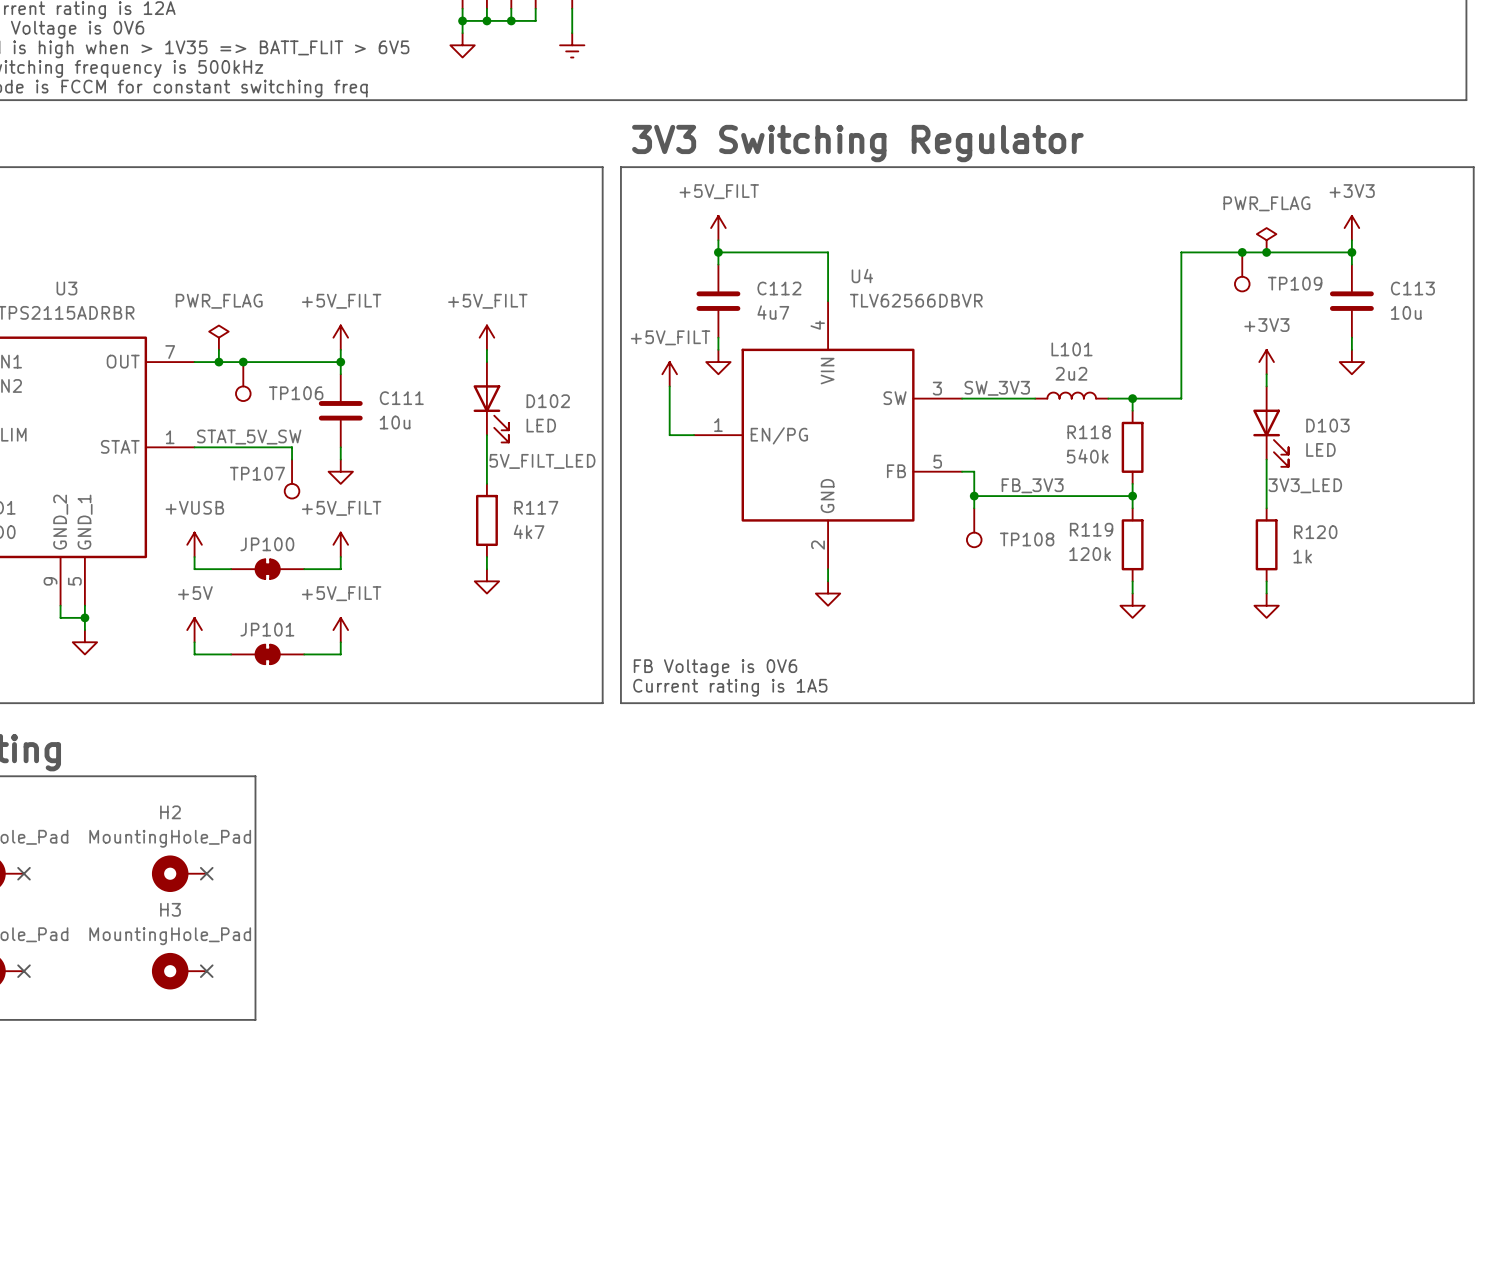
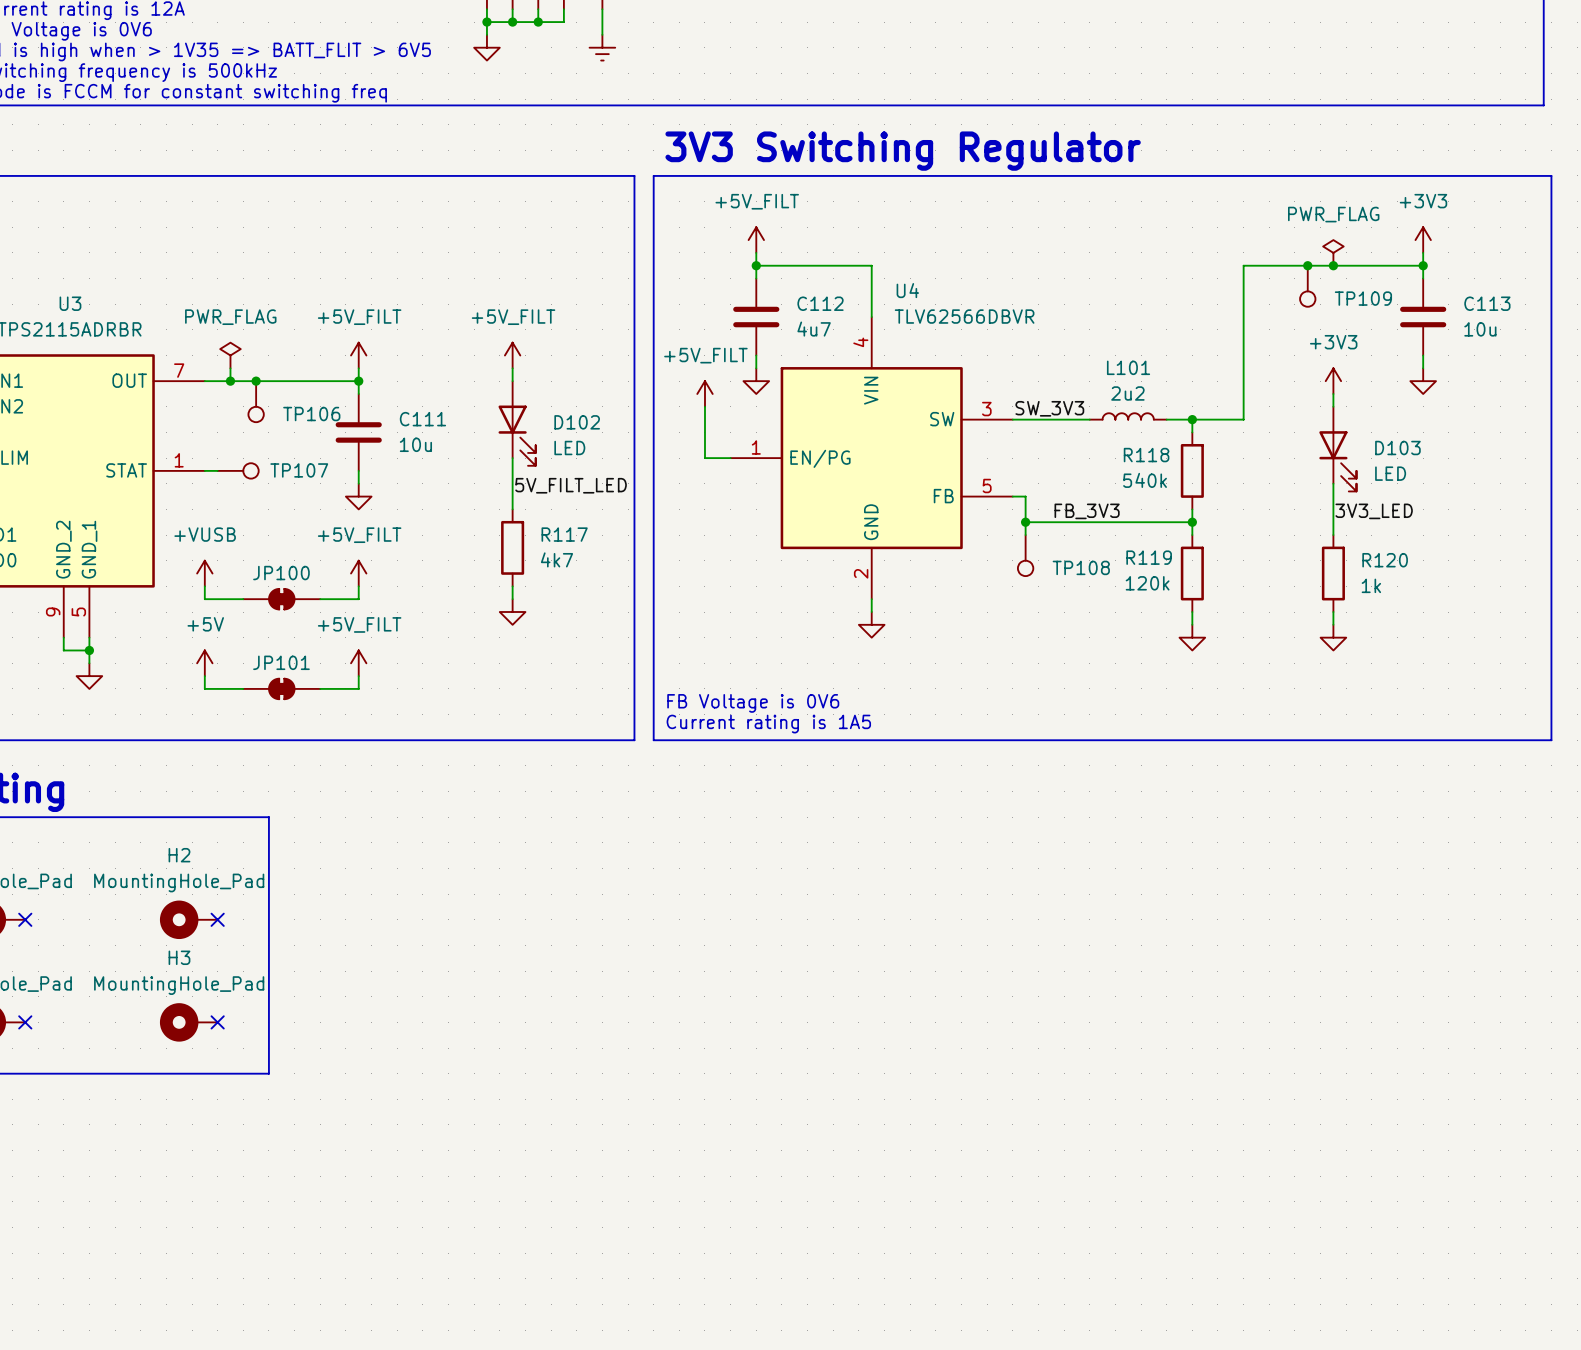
label: STAT_5V_SW (249, 437) -> none
wire: (206, 447) (292, 447) (292, 459) -> none
TP107 name position: TP107 (257, 473) -> TP107 (299, 470)
TP107 position: (292, 479) -> (238, 470)
TP107 rotation: 0° (292, 491) -> 90° counterclockwise (250, 470)

